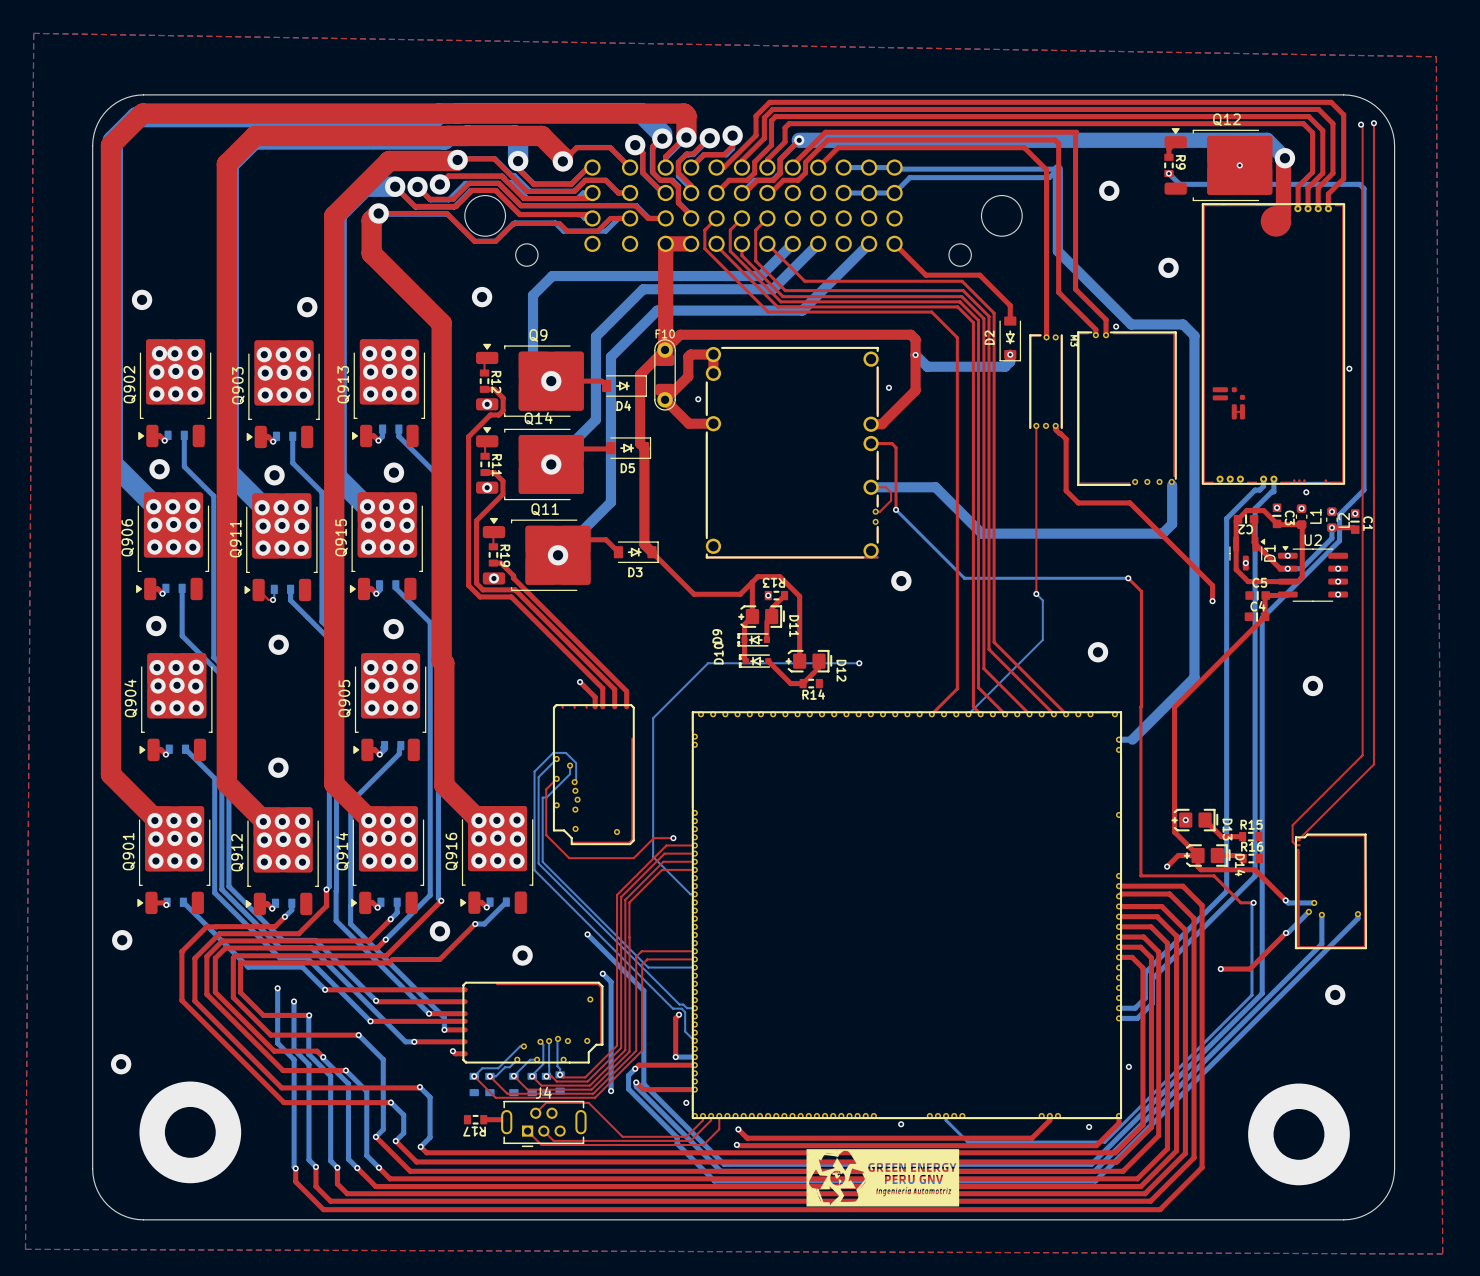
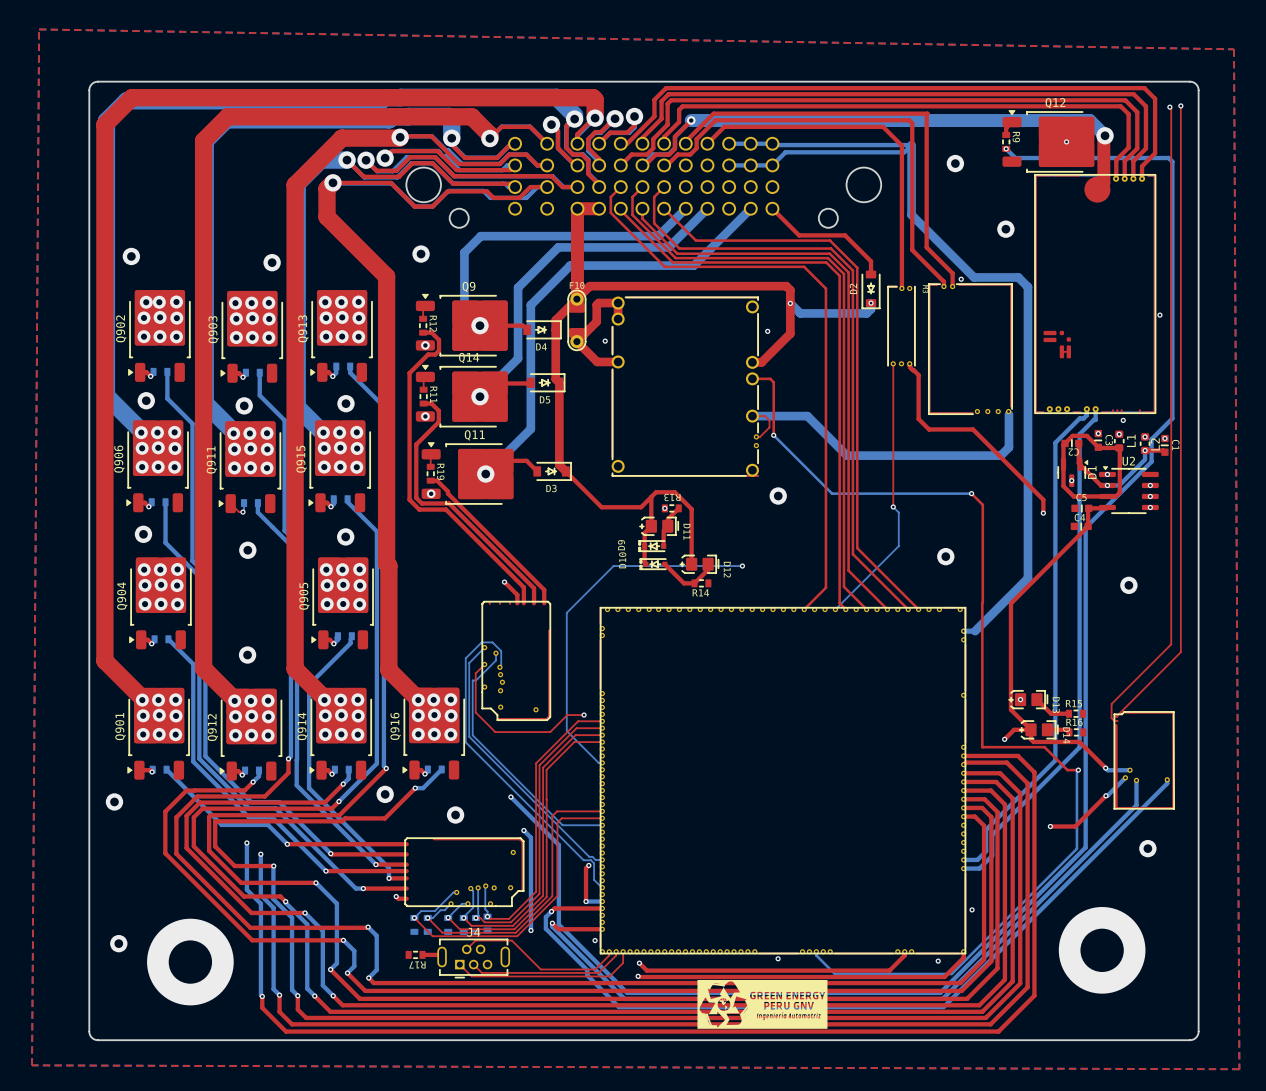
board edge: (92, 145) (97, 123) (107, 109) (121, 99) (143, 94) (1343, 94) (1360, 97) (1375, 105) (1389, 123) (1394, 145) (1394, 1168) (1389, 1191) (1379, 1204) (1365, 1214) (1343, 1219) -> (89, 125) (89, 88) (92, 83) (97, 81) (1189, 81) (1195, 83) (1198, 90) (1198, 1031) (1196, 1036) (1191, 1039) (1155, 1040)
via position: (121, 1064) -> (118, 943)
via position: (190, 1132) -> (190, 962)
via position: (1298, 1134) -> (1102, 950)
board edge: (92, 1168) (97, 1191) (107, 1204) (121, 1214) (143, 1219) -> (89, 996) (89, 1032) (91, 1037) (97, 1040) (132, 1040)

